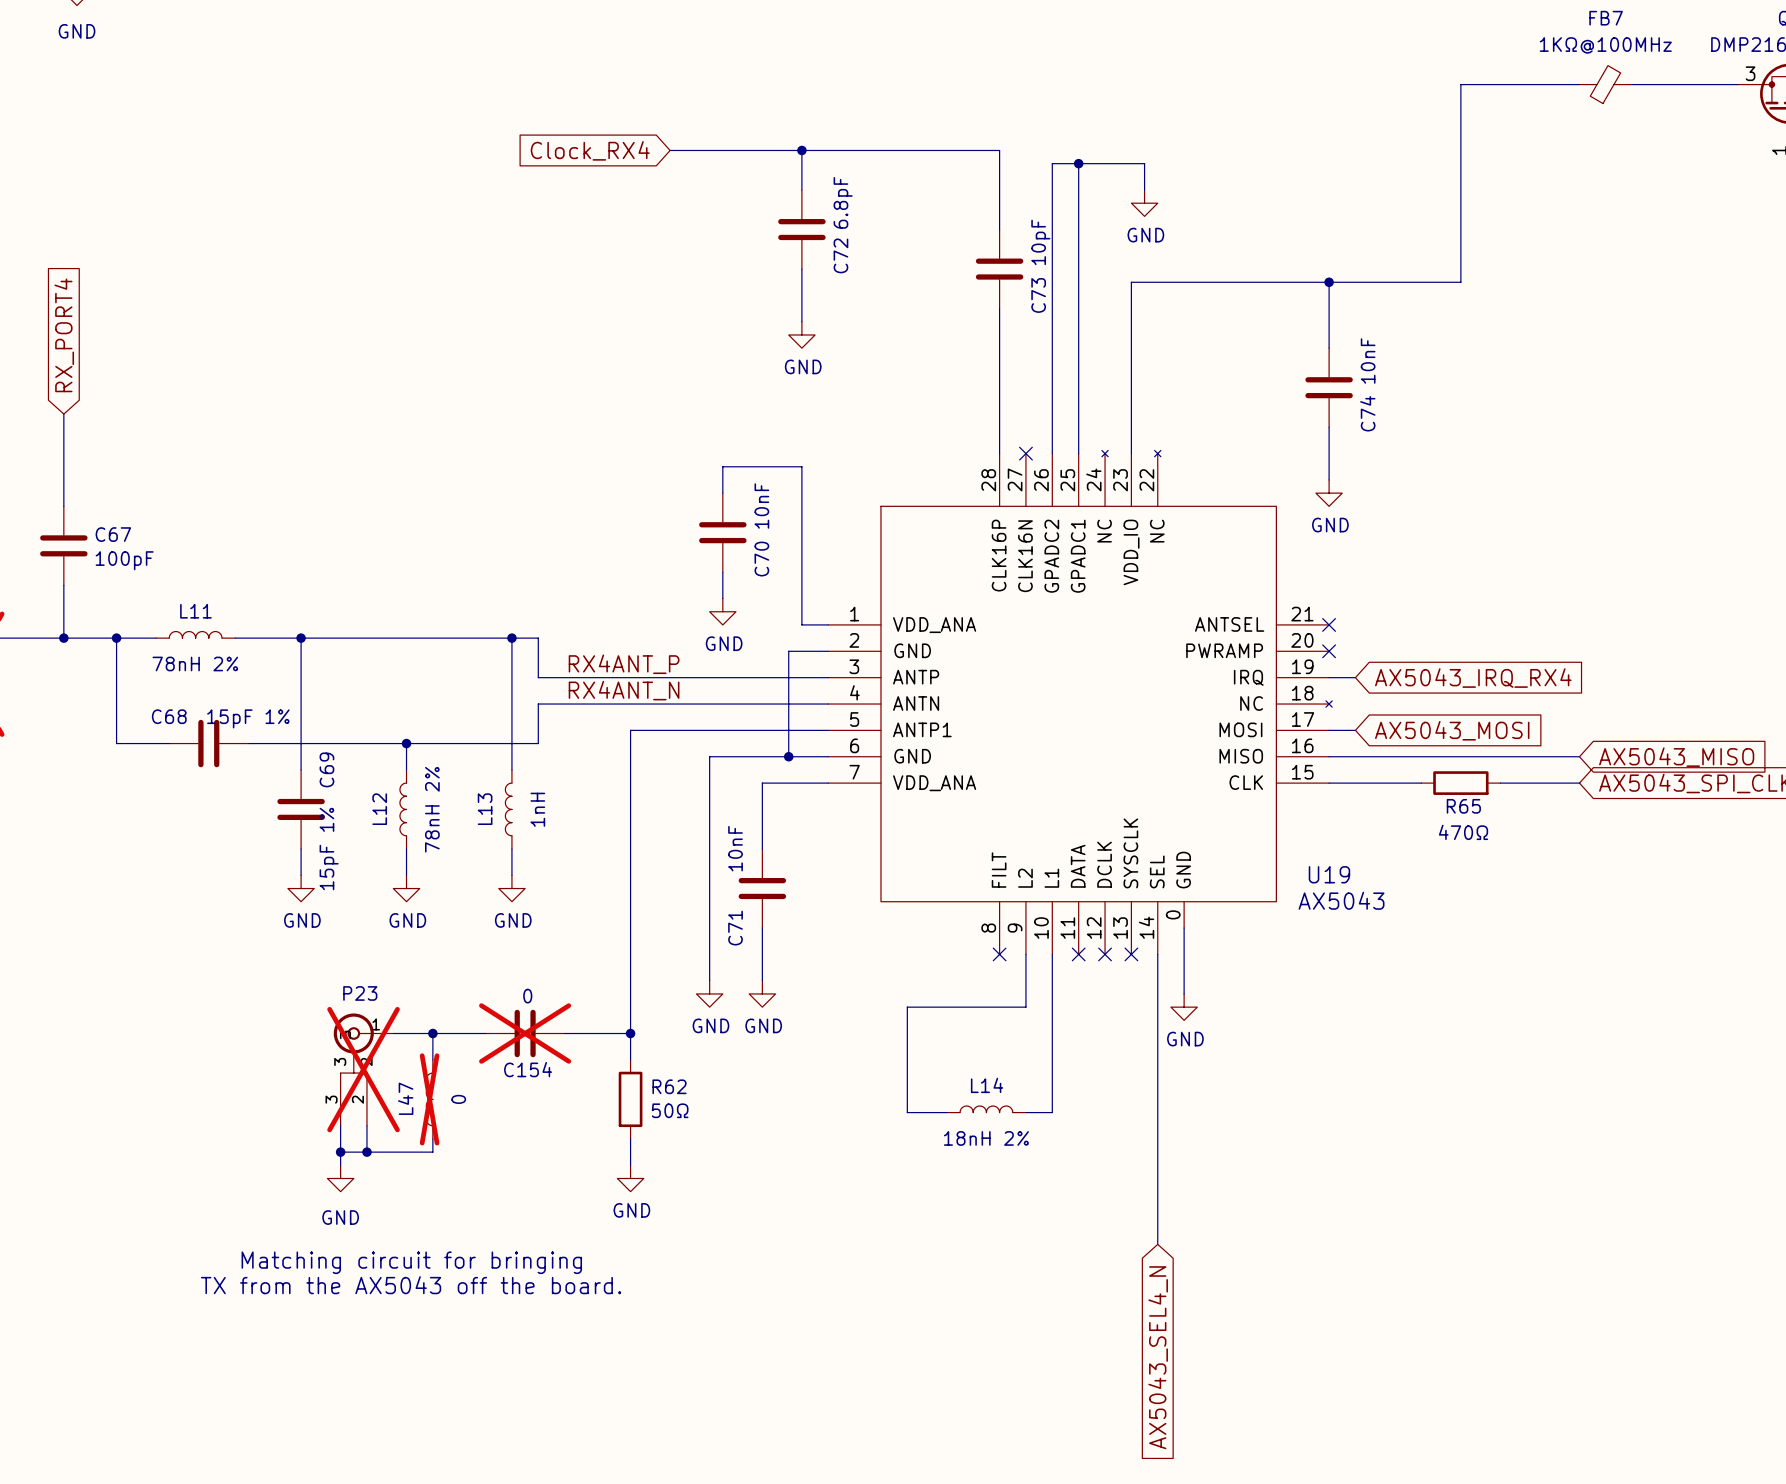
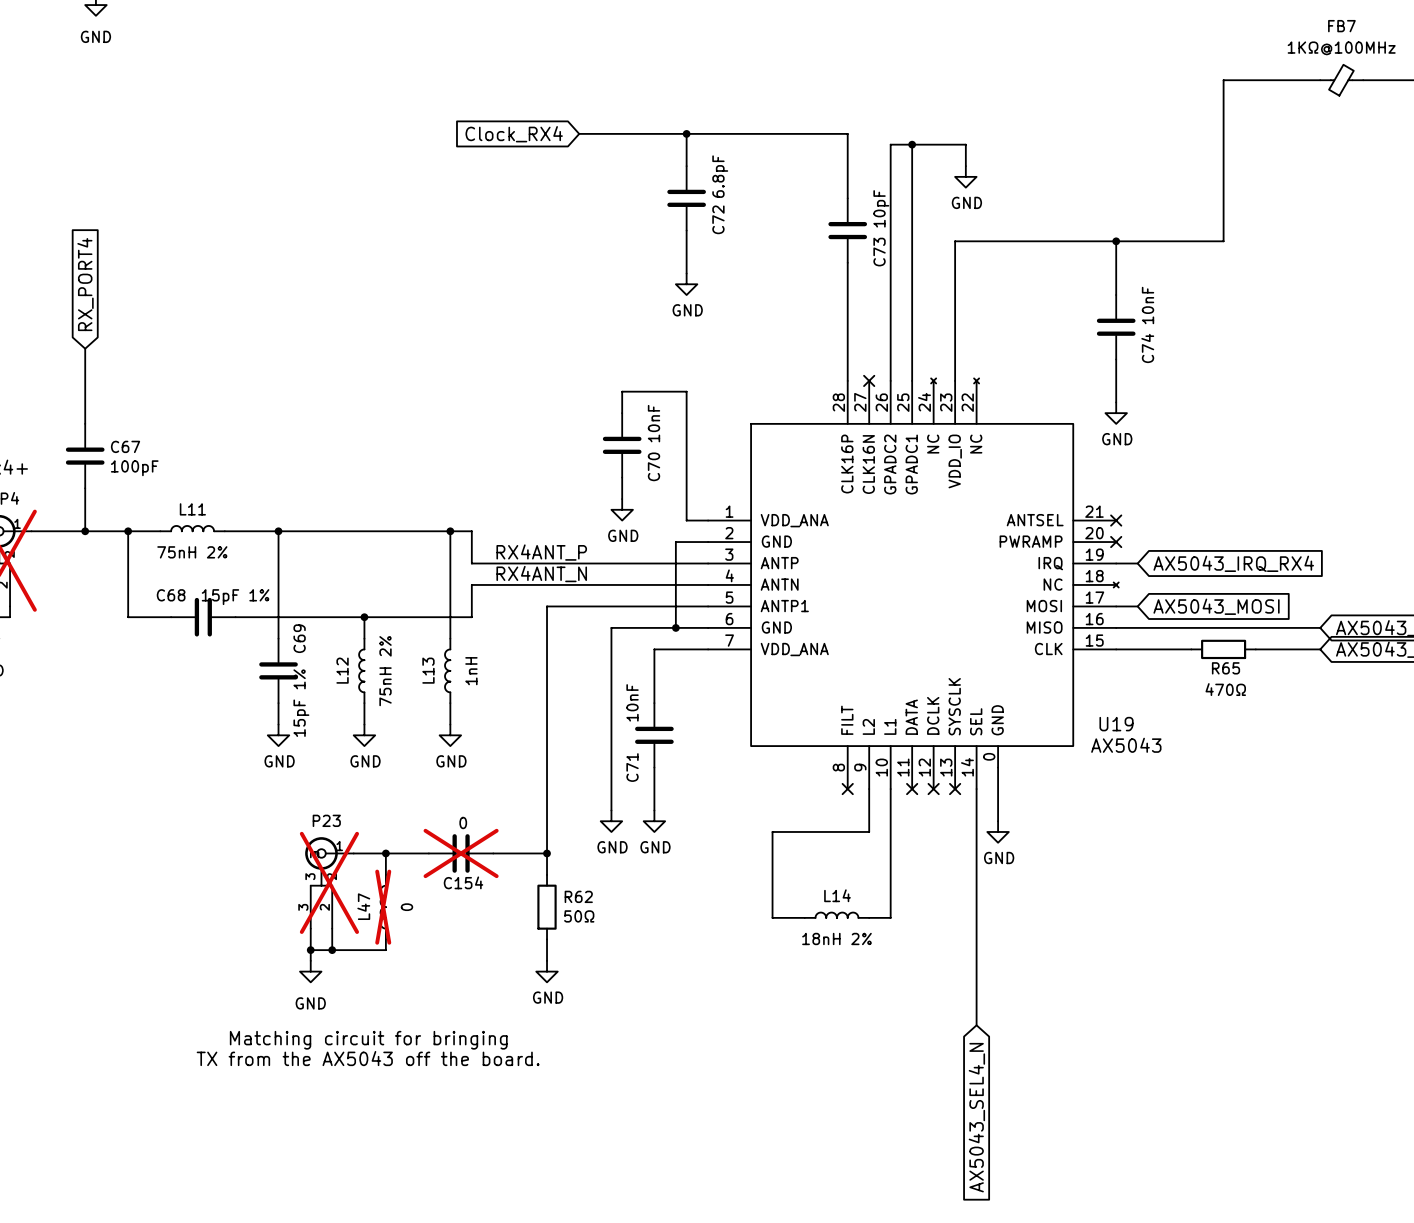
L11 value: 78nH 2% (195, 663) -> 75nH 2% (192, 552)
L12 value: 78nH 2% (432, 809) -> 75nH 2% (385, 671)

